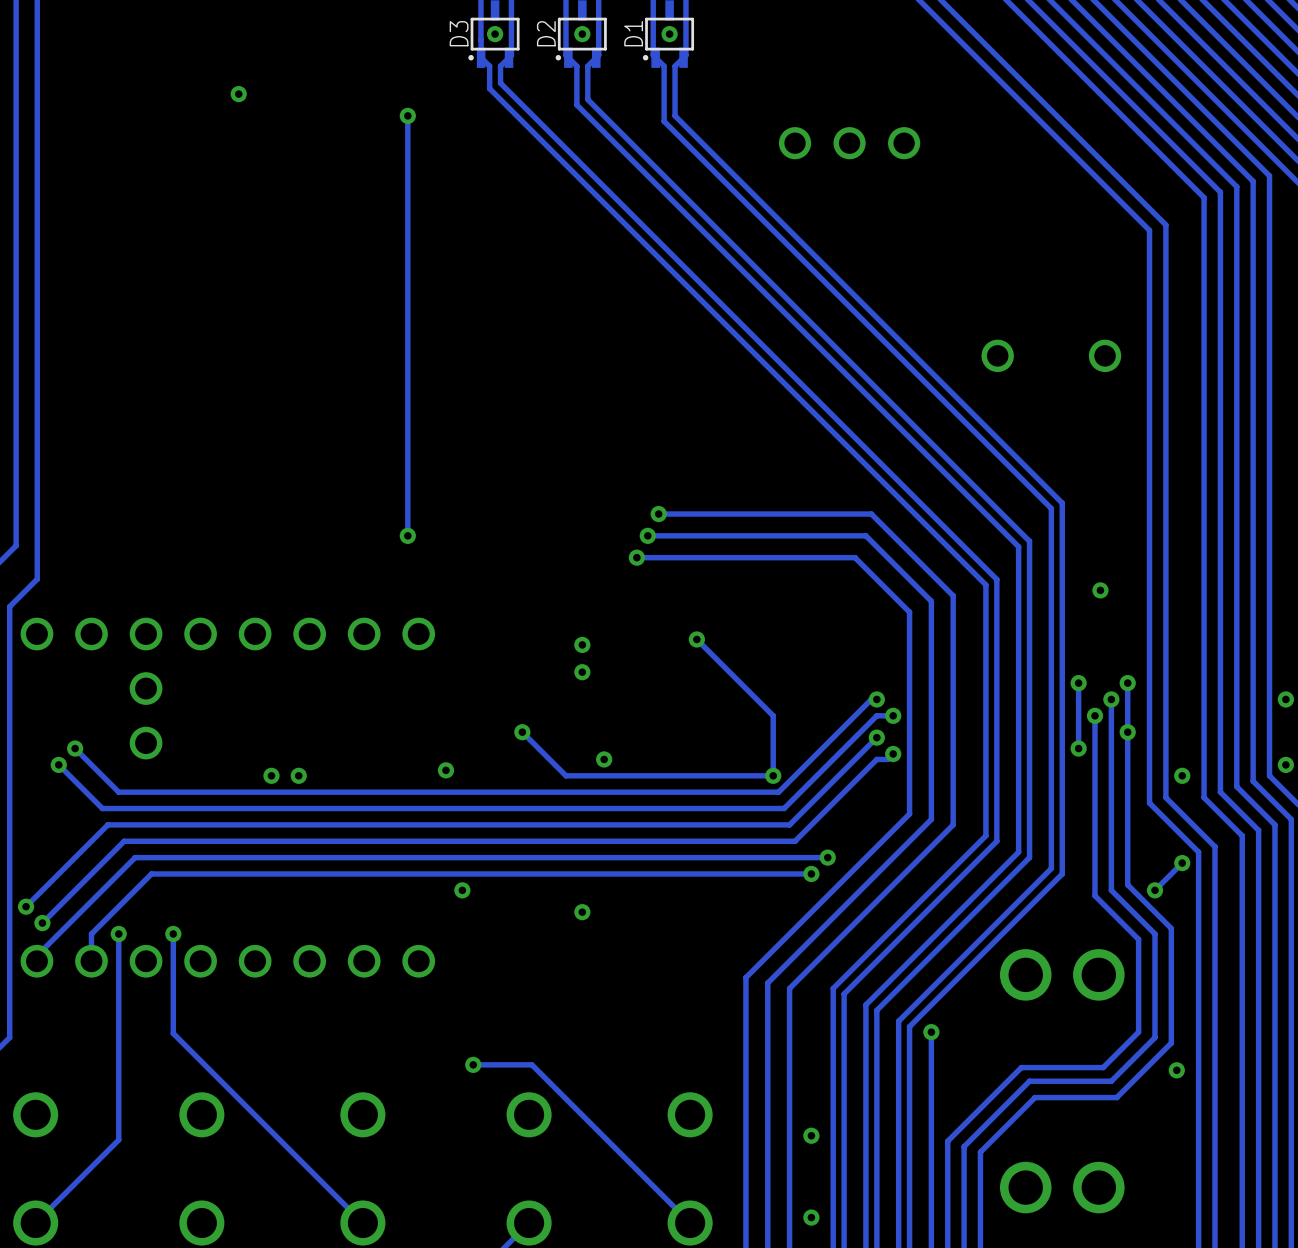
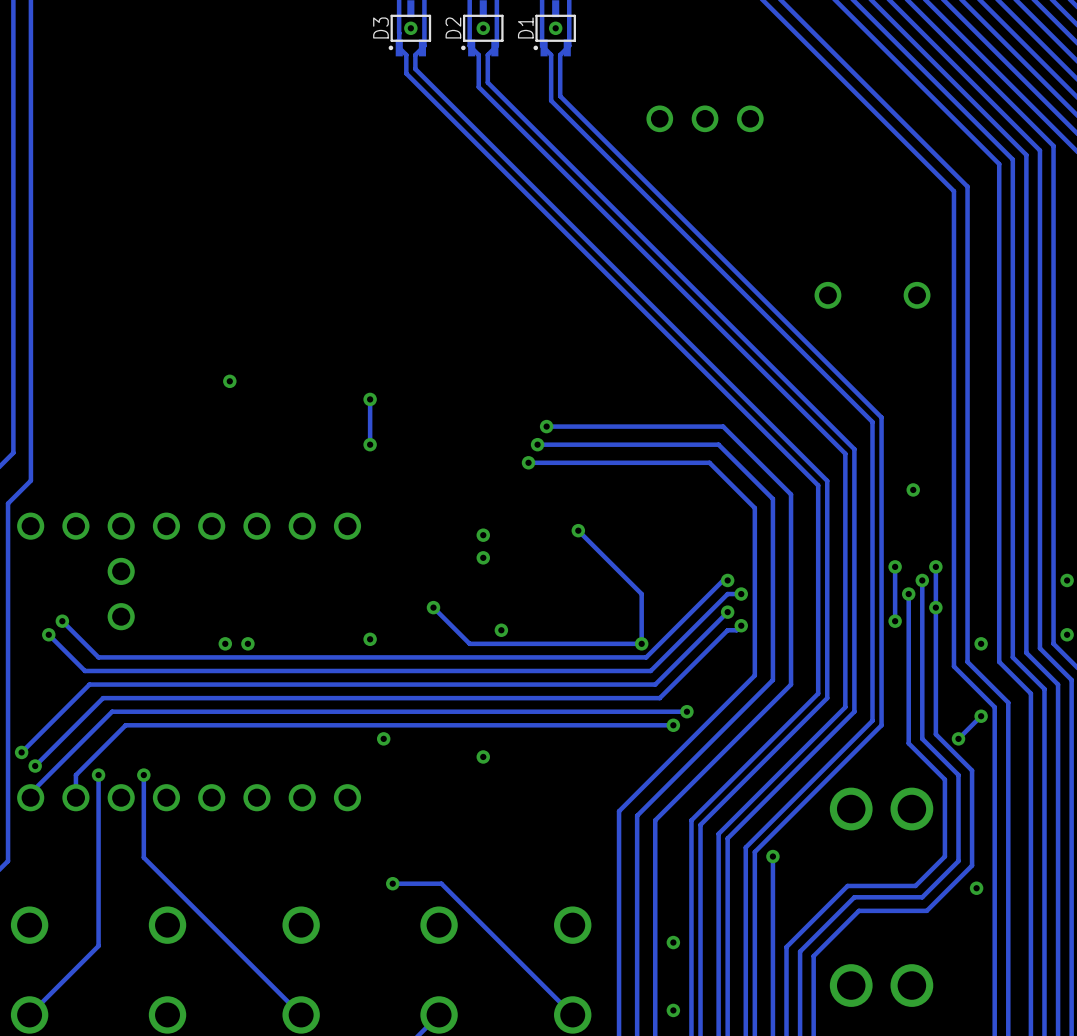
via: (238, 94) -> none
track: (407, 115) (407, 535) -> none
via: (407, 115) -> none
via: none -> (229, 381)
track: none -> (370, 399) (370, 444)
via: none -> (370, 399)
via: (407, 535) -> none
via: none -> (370, 444)

